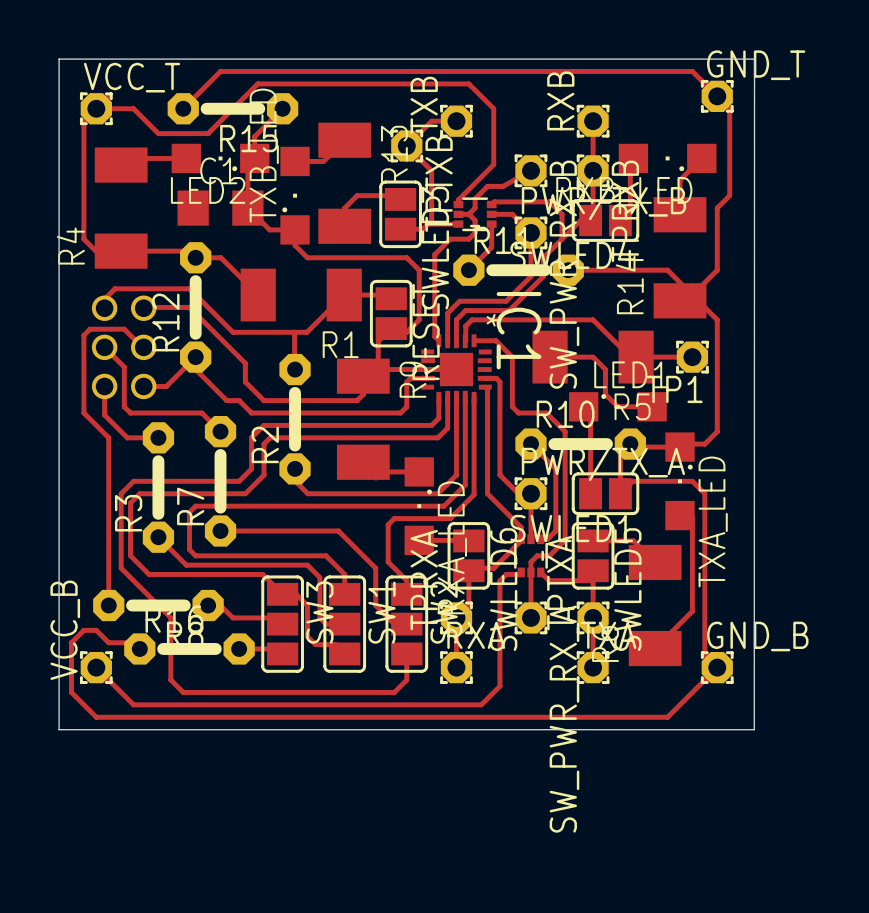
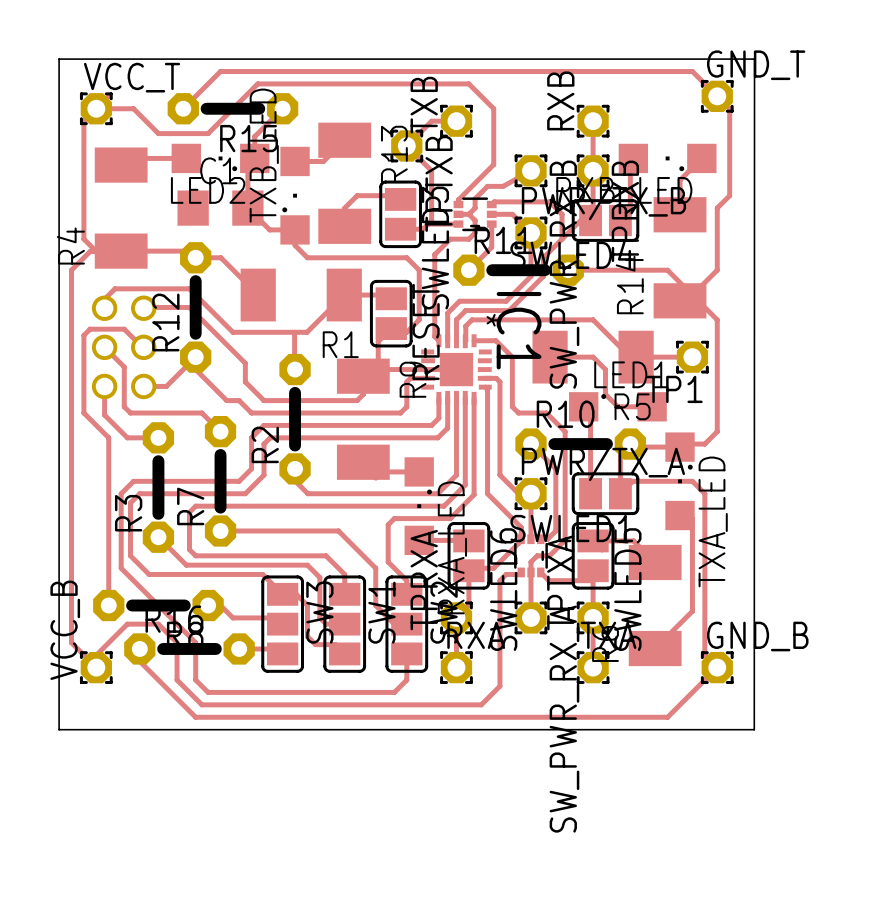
top track: (170, 617) (170, 680) (183, 692) (208, 692) -> (170, 617) (195, 642) (195, 680) (208, 692)
top track: (146, 642) (108, 642) (96, 630) (83, 630) (71, 642) (71, 692) (96, 717) (195, 717) -> (139, 648) (139, 661) (195, 717)
top track: (96, 667) (133, 704) (201, 704) -> (121, 251) (90, 251) (71, 270) (71, 642) (96, 667) (96, 655) (127, 624) (158, 624) (177, 642) (177, 680) (201, 704)

